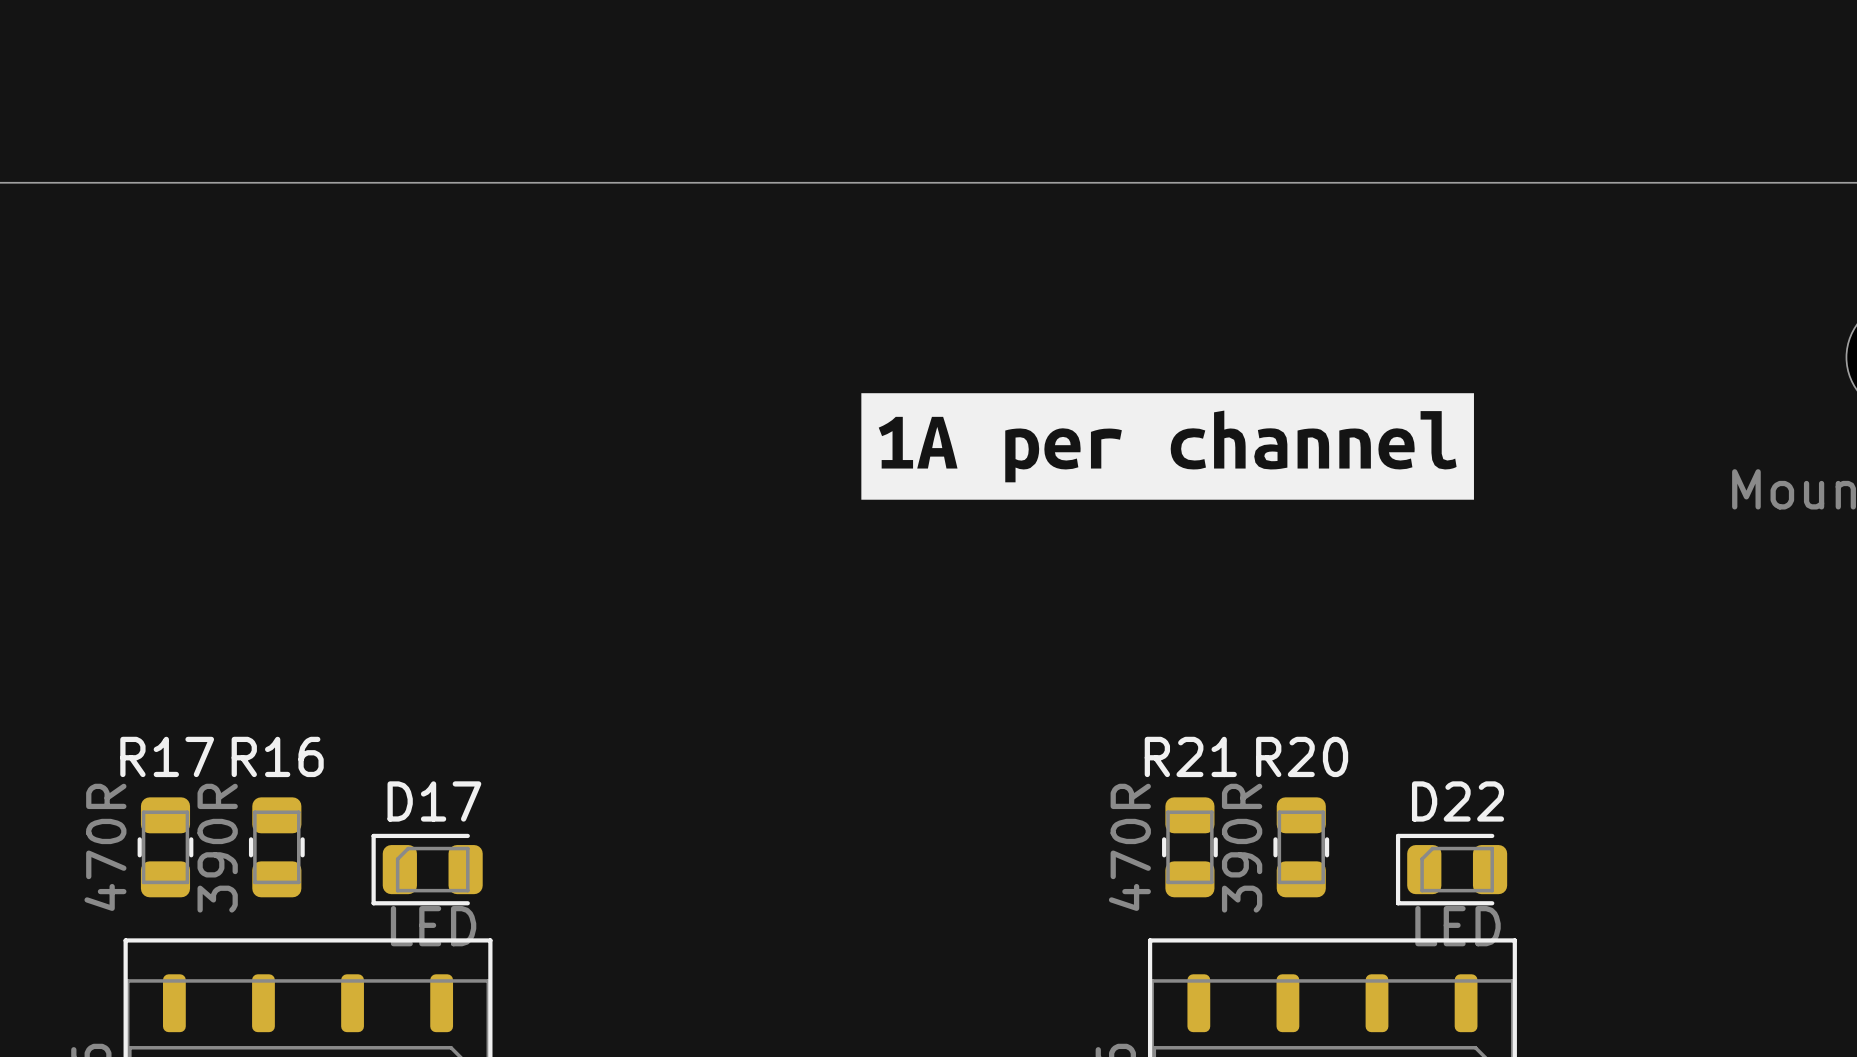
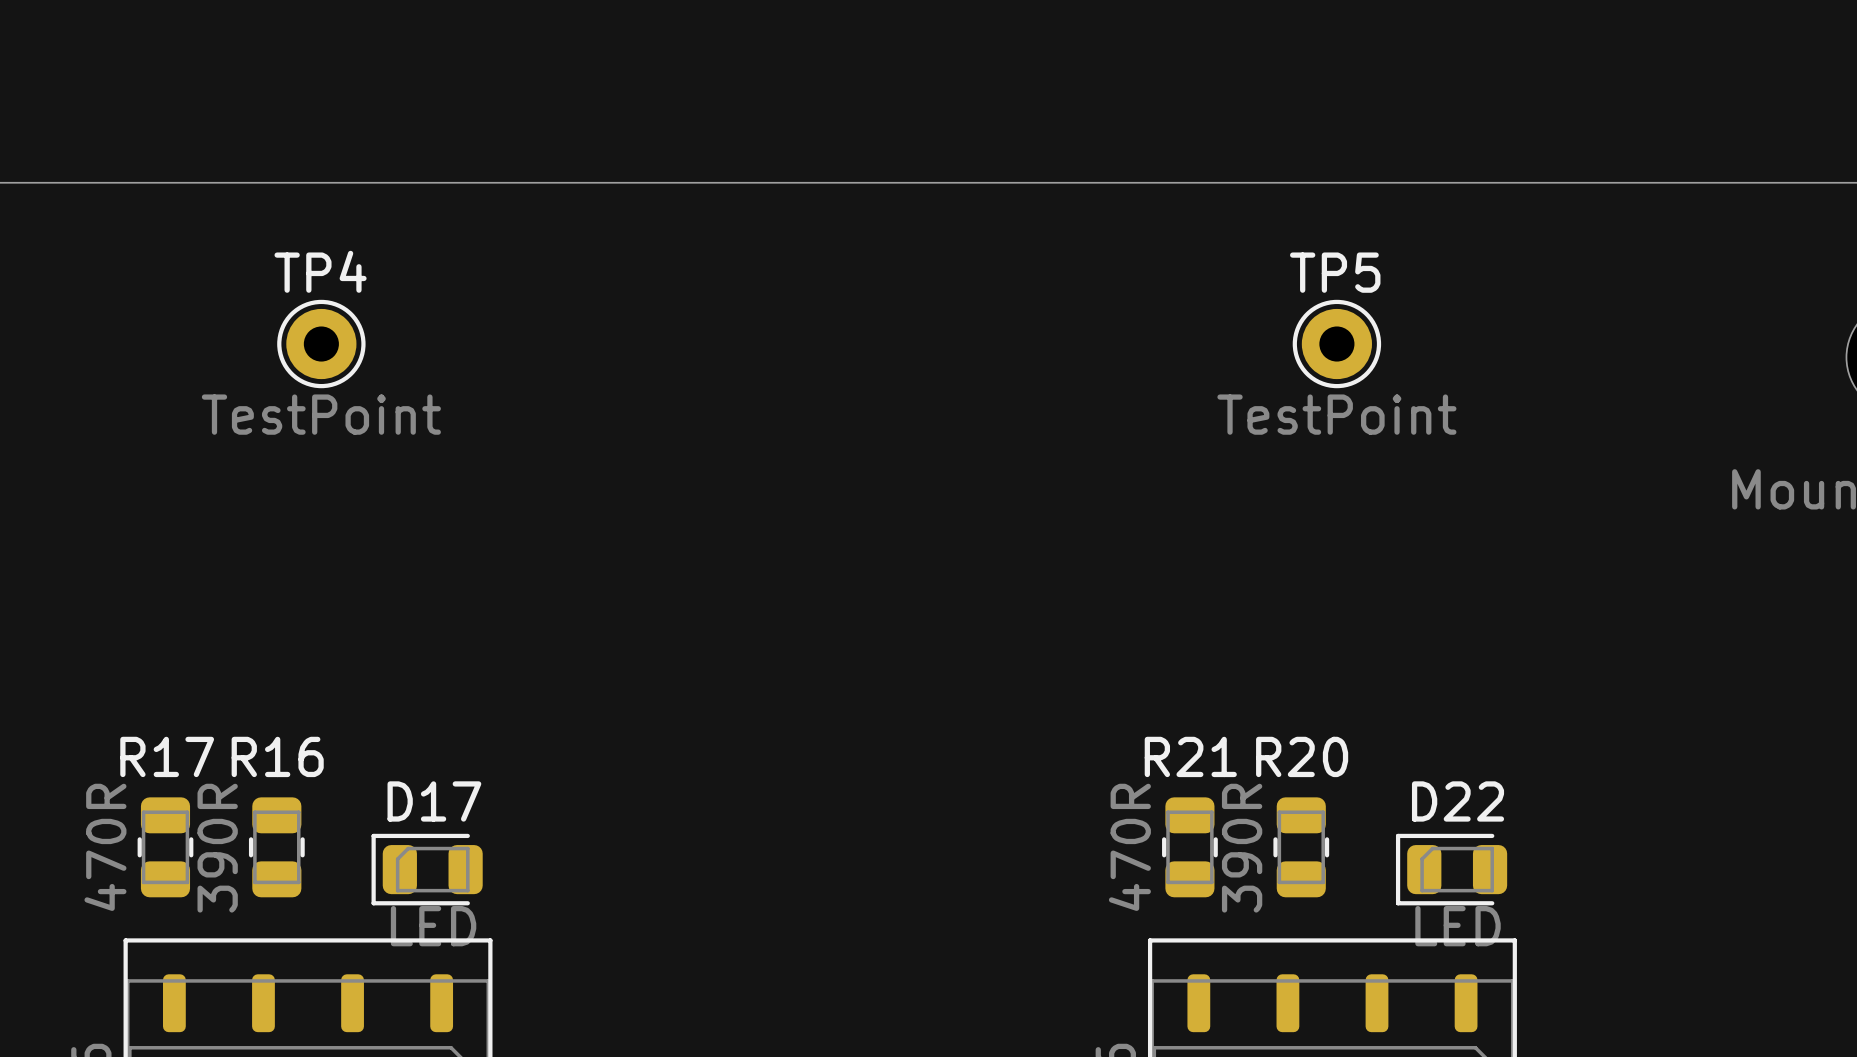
TP4: none -> TestPoint (321, 344)
TP5: none -> TestPoint (1336, 344)
drawing: [861, 393, 1474, 500] -> none

